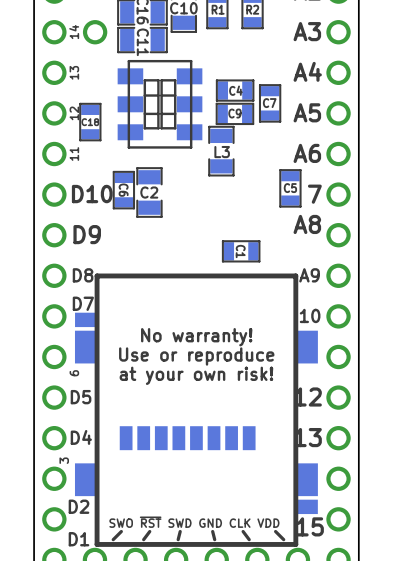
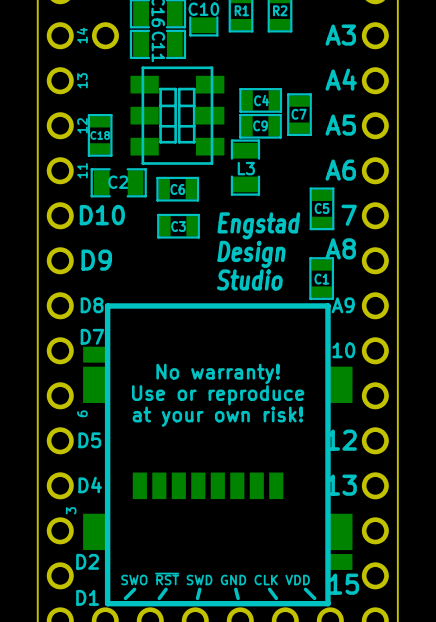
C6 rotation: 0° (123, 190) -> 90° clockwise (177, 189)
C6 position: (123, 190) -> (177, 189)
C2 rotation: 0° (149, 192) -> 90° clockwise (118, 182)
C2 position: (149, 192) -> (118, 182)
text: none -> Engstad (258, 225)
C3: none -> (178, 226)
text: none -> Design (251, 254)
C1 rotation: 0° (241, 251) -> 90° clockwise (321, 278)
C1 position: (241, 251) -> (321, 278)
text: none -> Studio (249, 279)

